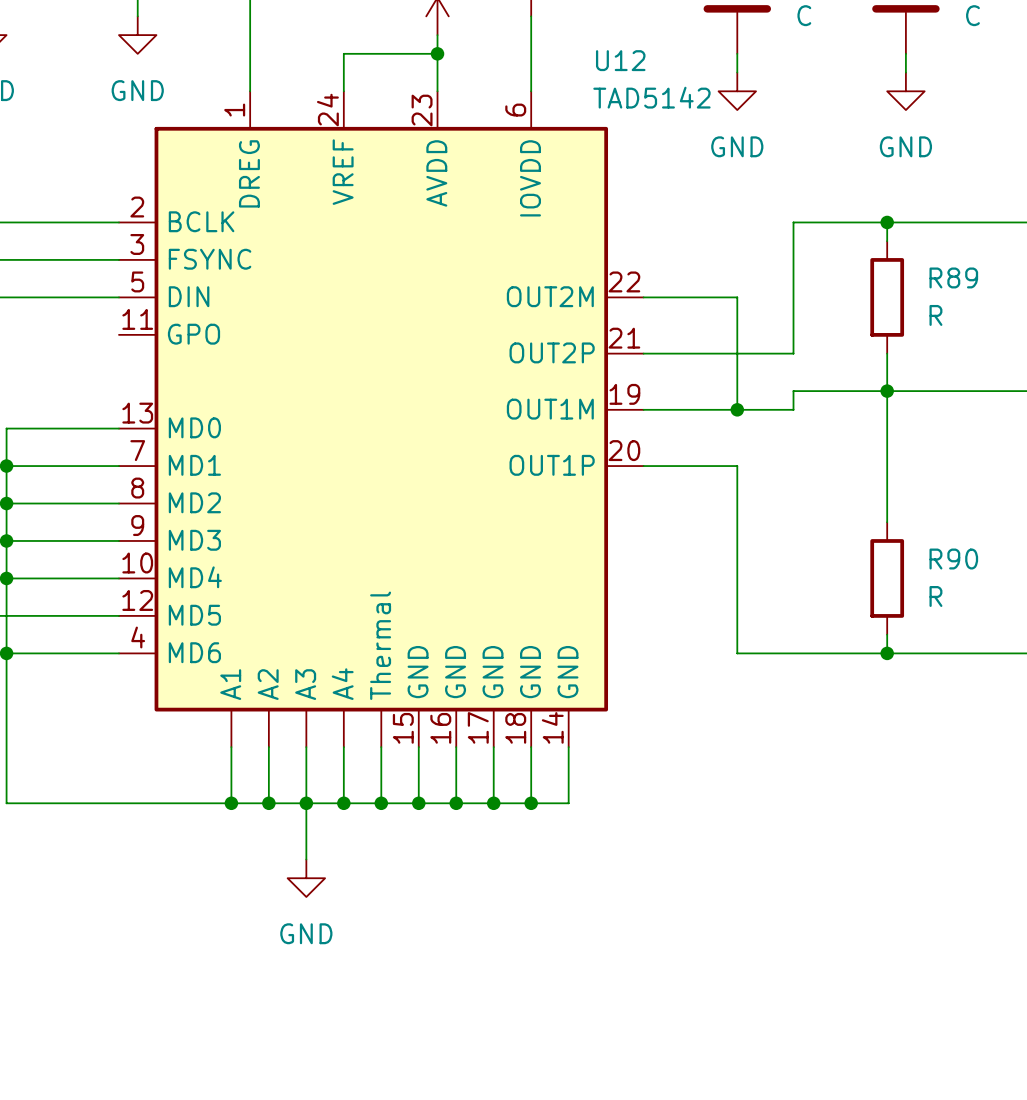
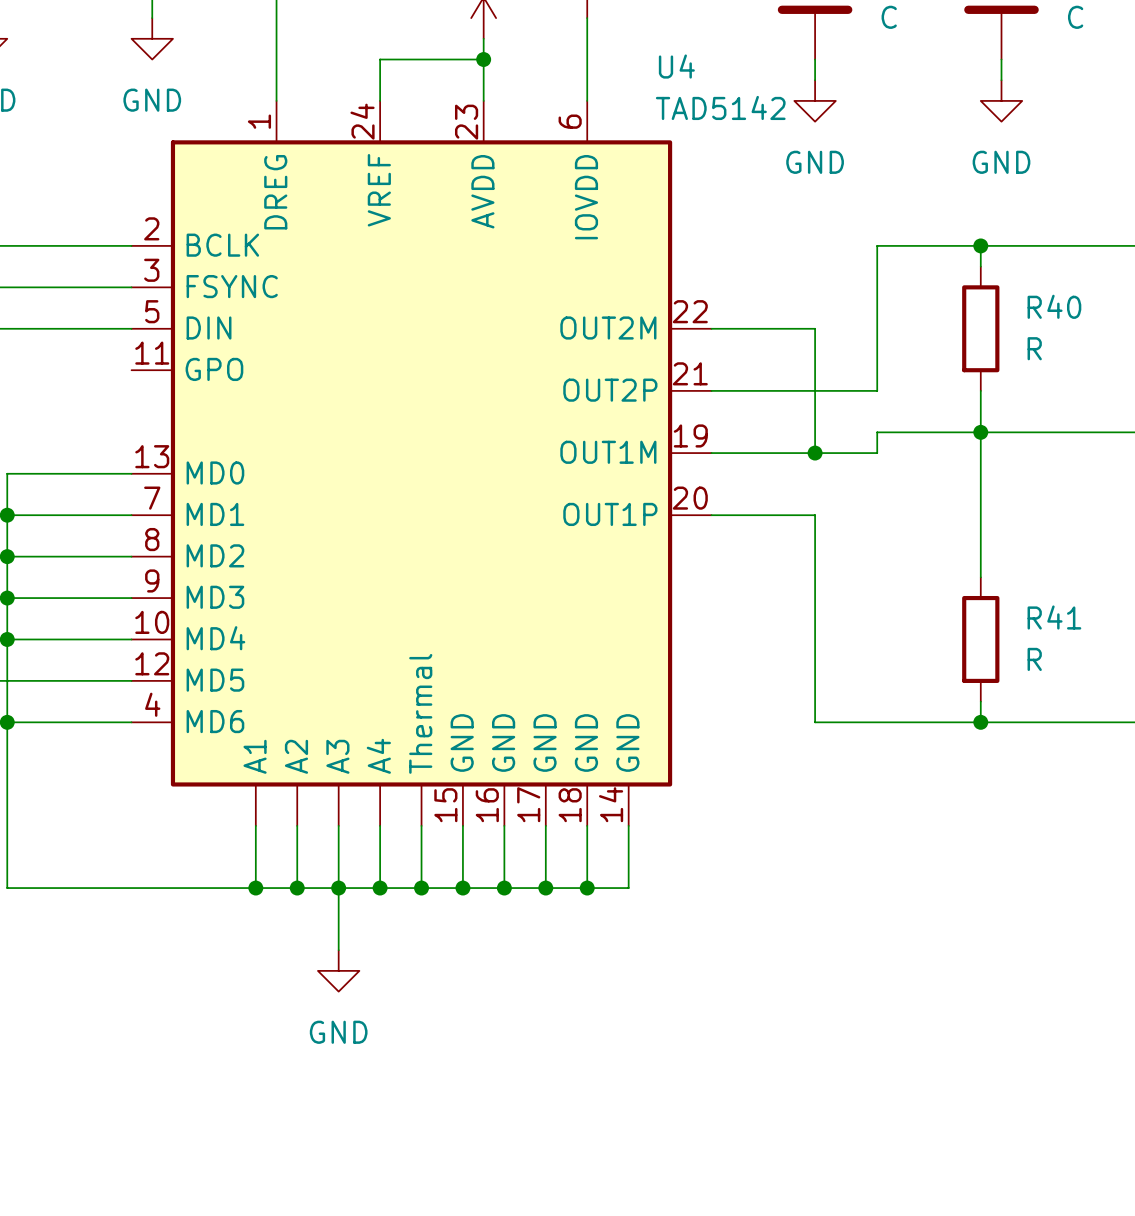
U12 name: U12 (620, 60) -> U4 (676, 66)
R89 name: R89 (953, 277) -> R40 (1054, 306)
R90 name: R90 (953, 559) -> R41 (1054, 617)

